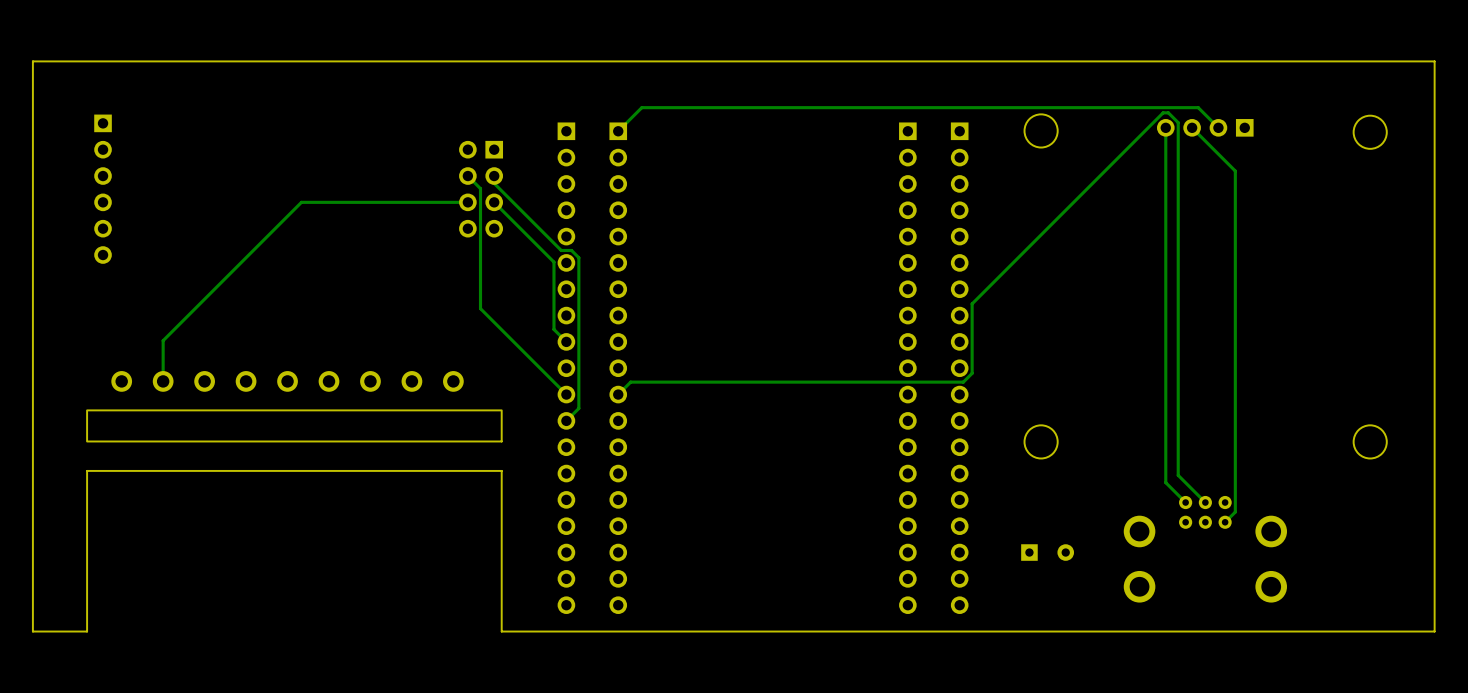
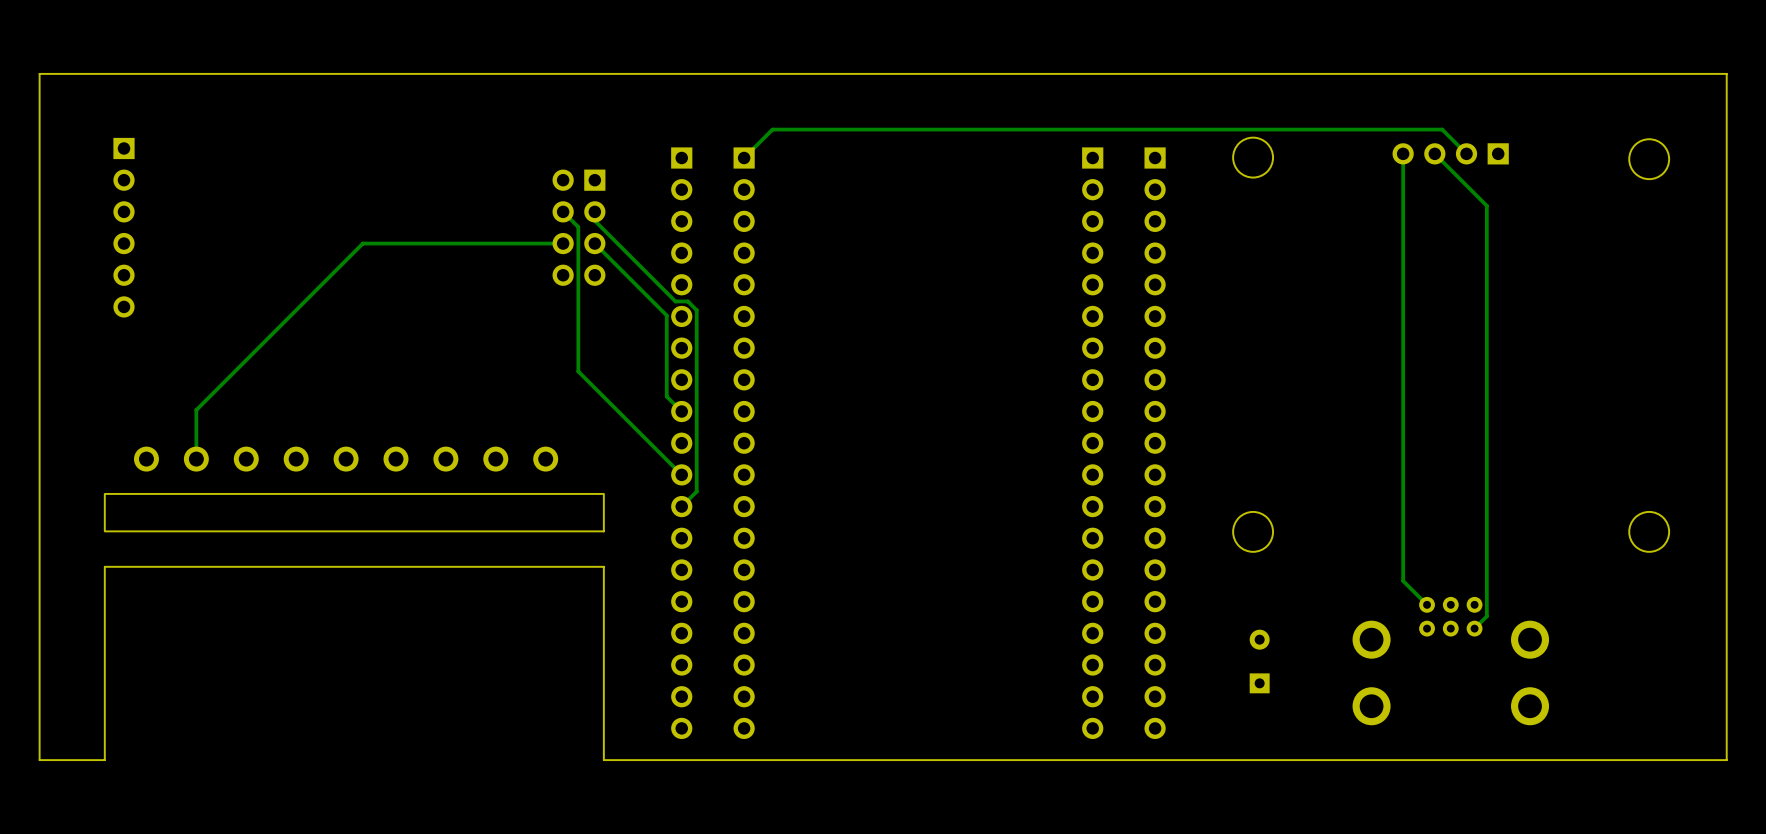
track: (618, 394) (630, 382) (963, 382) (972, 373) (972, 303) (1163, 112) (1168, 112) (1178, 122) (1178, 475) (1205, 502) -> none
part rotation: 0° (1047, 552) -> 90° counterclockwise (1259, 661)

